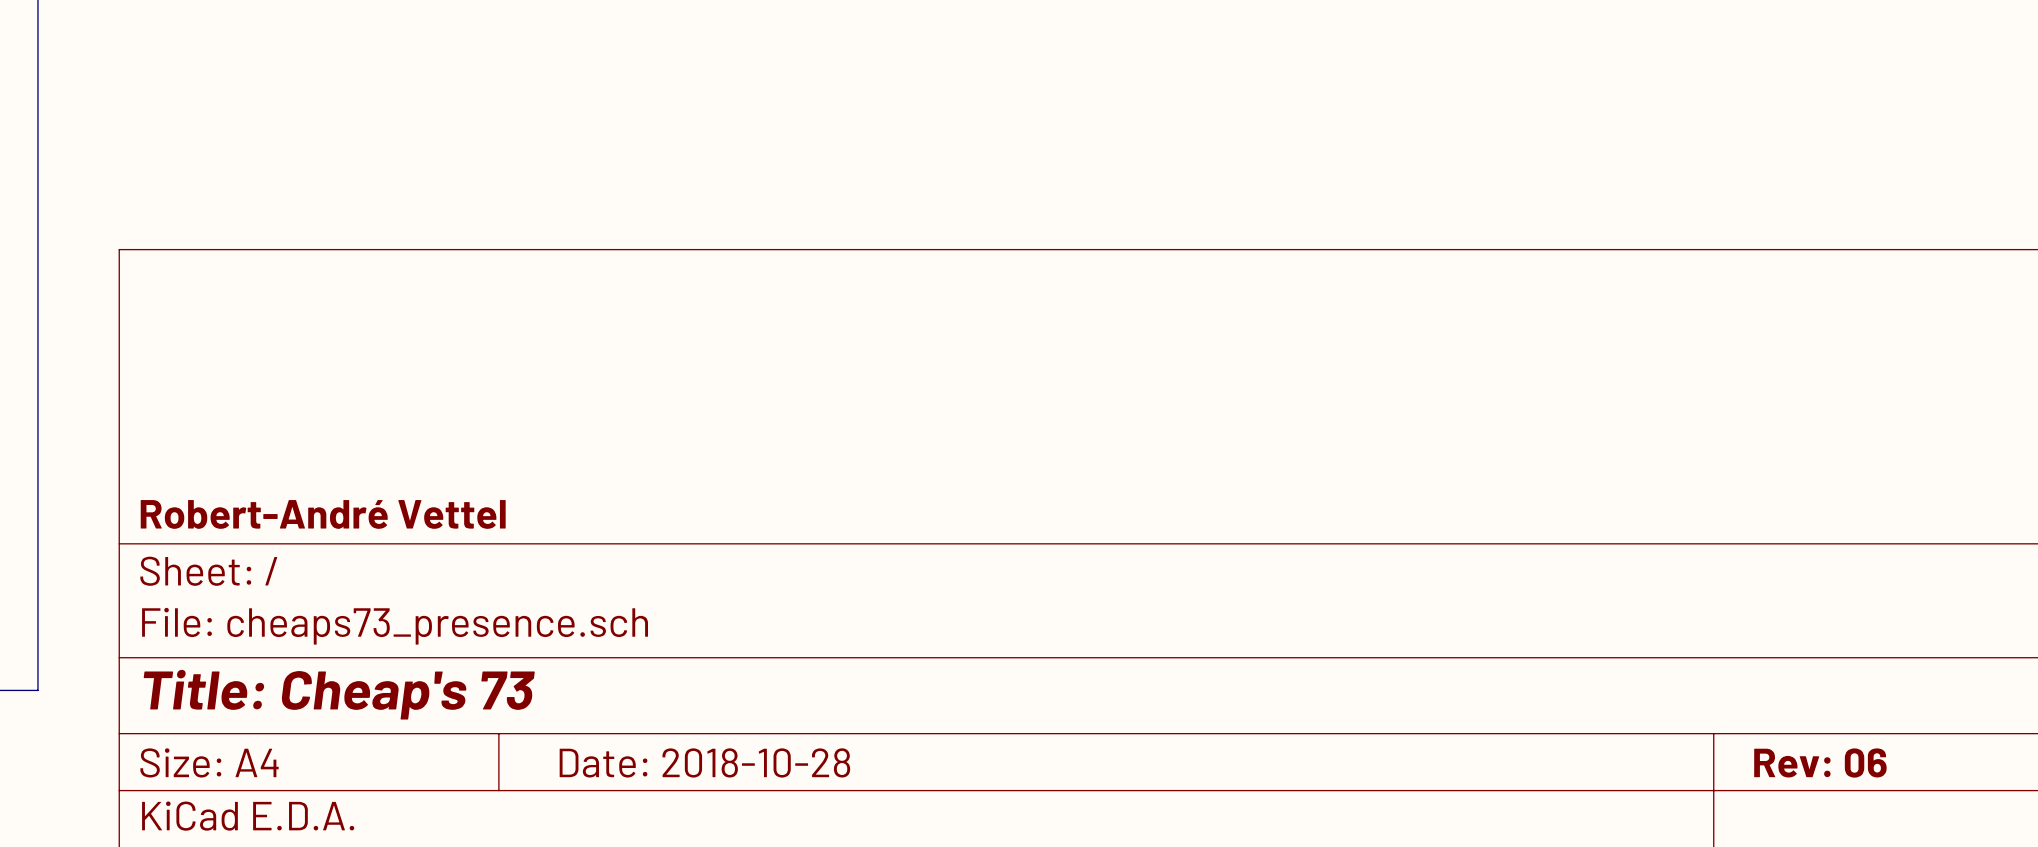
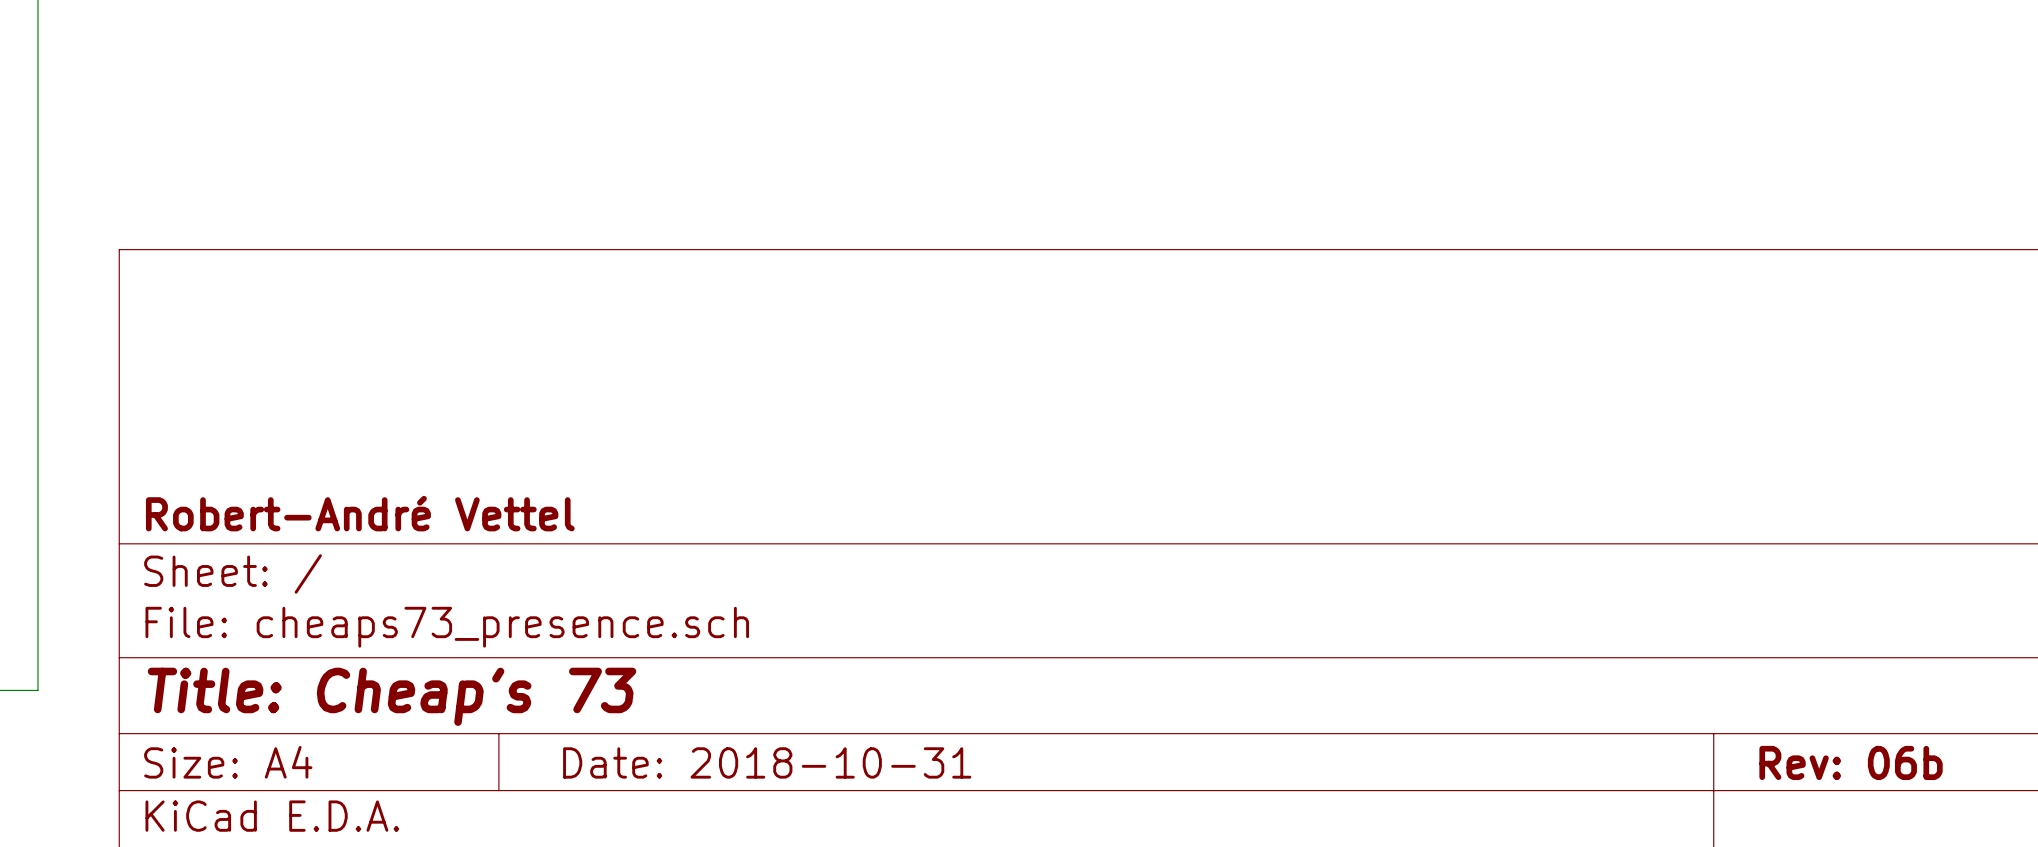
title block: Date: 2018-10-28 (704, 762) -> Date: 2018-10-31 (767, 762)
title block: Rev: 06 (1820, 763) -> Rev: 06b (1851, 762)

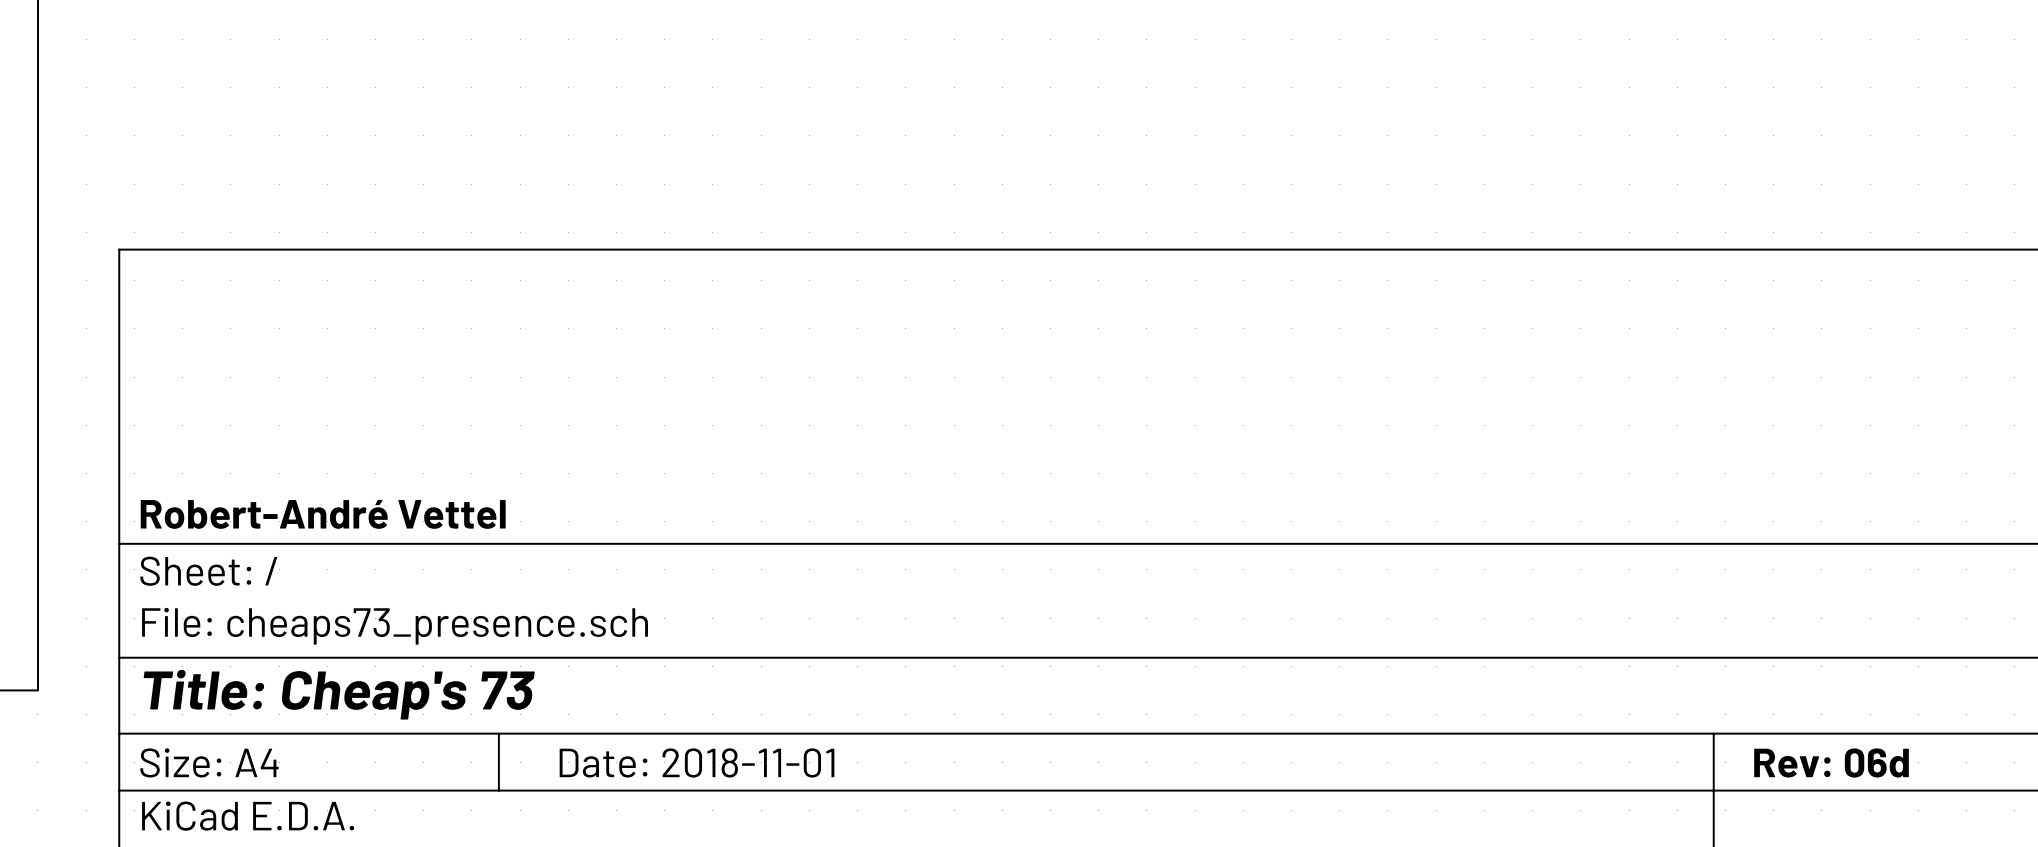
title block: Date: 2018-10-31 (767, 762) -> Date: 2018-11-01 (697, 762)
title block: Rev: 06b (1851, 762) -> Rev: 06d (1831, 763)

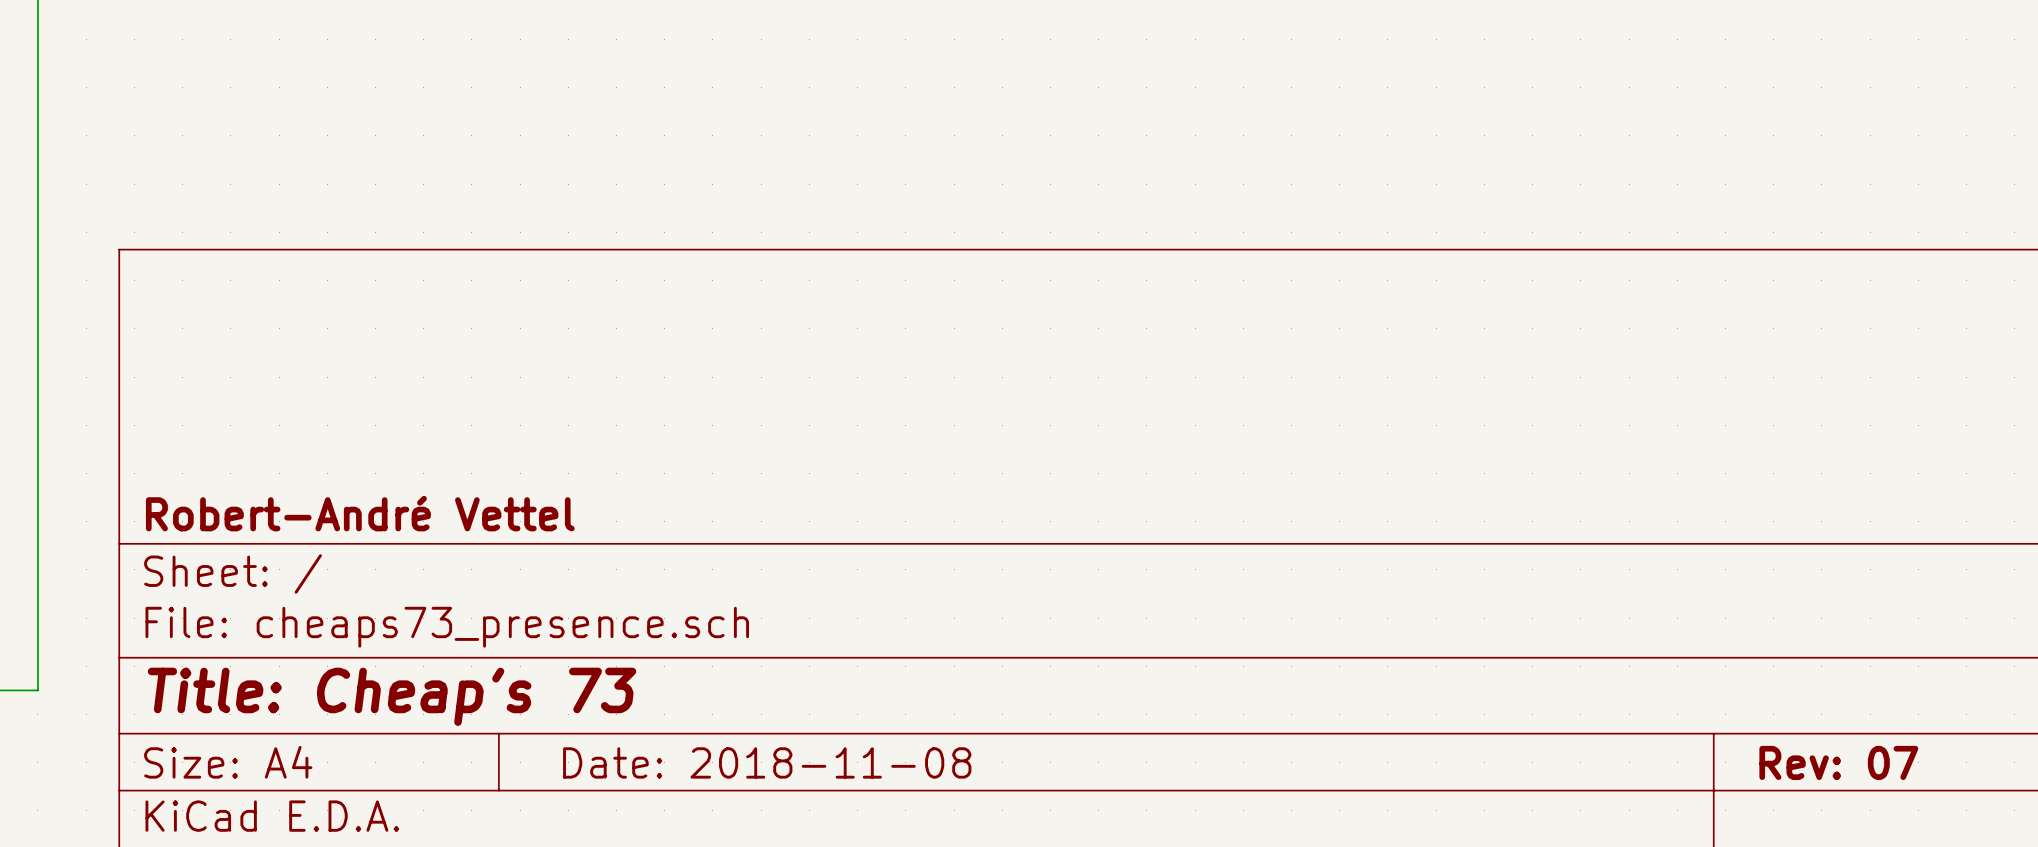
title block: Date: 2018-11-01 (697, 762) -> Date: 2018-11-08 (767, 762)
title block: Rev: 06d (1831, 763) -> Rev: 07 (1838, 762)

